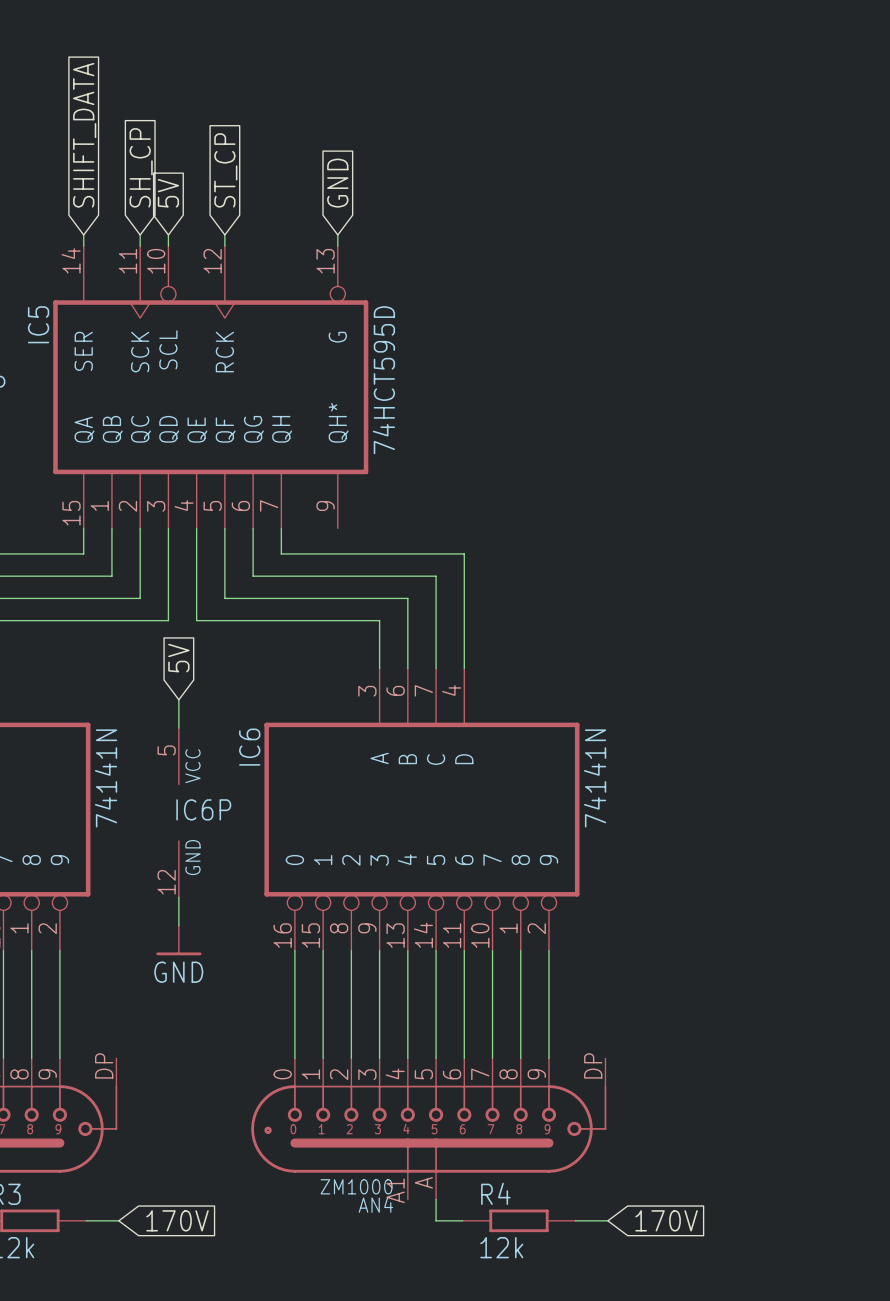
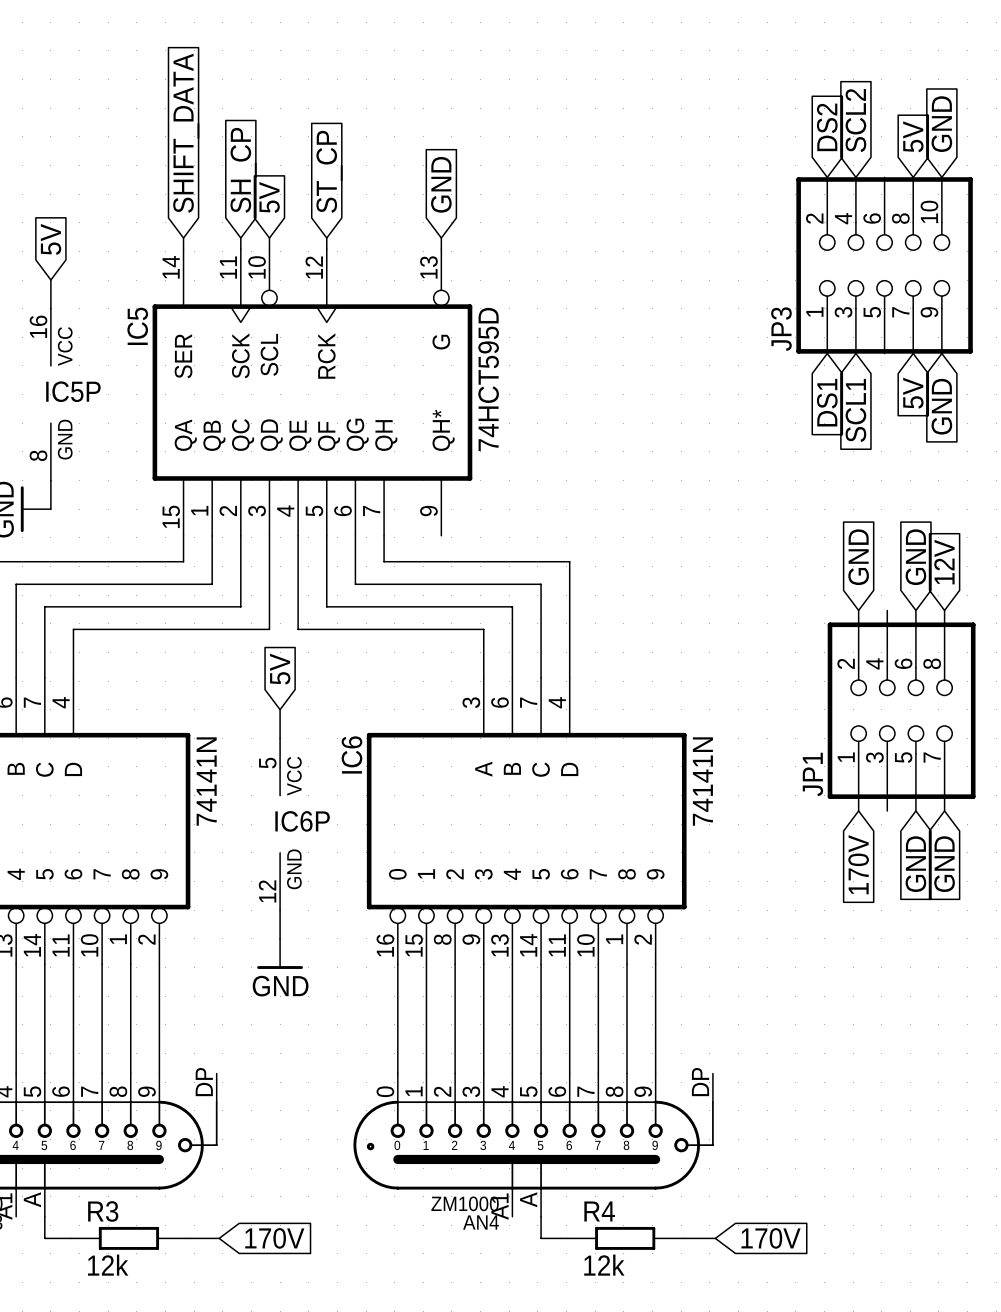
global label: none -> SCL2 (855, 120)
global label: none -> GND (941, 124)
global label: none -> DS2 (827, 127)
global label: none -> 5V (913, 136)
wire: none -> (827, 177) (827, 222)
wire: none -> (855, 177) (855, 222)
wire: none -> (884, 177) (884, 222)
wire: none -> (913, 177) (913, 222)
wire: none -> (941, 177) (941, 222)
JP3: none -> (884, 265)
wire: none -> (827, 308) (827, 353)
wire: none -> (855, 308) (855, 353)
wire: none -> (884, 308) (884, 353)
wire: none -> (913, 308) (913, 353)
wire: none -> (941, 308) (941, 353)
global label: none -> 5V (913, 393)
global label: none -> DS1 (827, 402)
global label: none -> GND (941, 406)
global label: none -> SCL1 (855, 410)
global label: none -> GND (858, 557)
global label: none -> GND (915, 557)
global label: none -> 12V (944, 562)
wire: none -> (858, 610) (858, 667)
wire: none -> (887, 610) (887, 667)
wire: none -> (915, 610) (915, 667)
wire: none -> (944, 610) (944, 667)
JP1: none -> (901, 710)
wire: none -> (858, 753) (858, 810)
wire: none -> (887, 753) (887, 810)
wire: none -> (915, 753) (915, 810)
wire: none -> (944, 753) (944, 810)
global label: none -> GND (915, 864)
global label: none -> GND (944, 864)
global label: none -> 170V (858, 864)

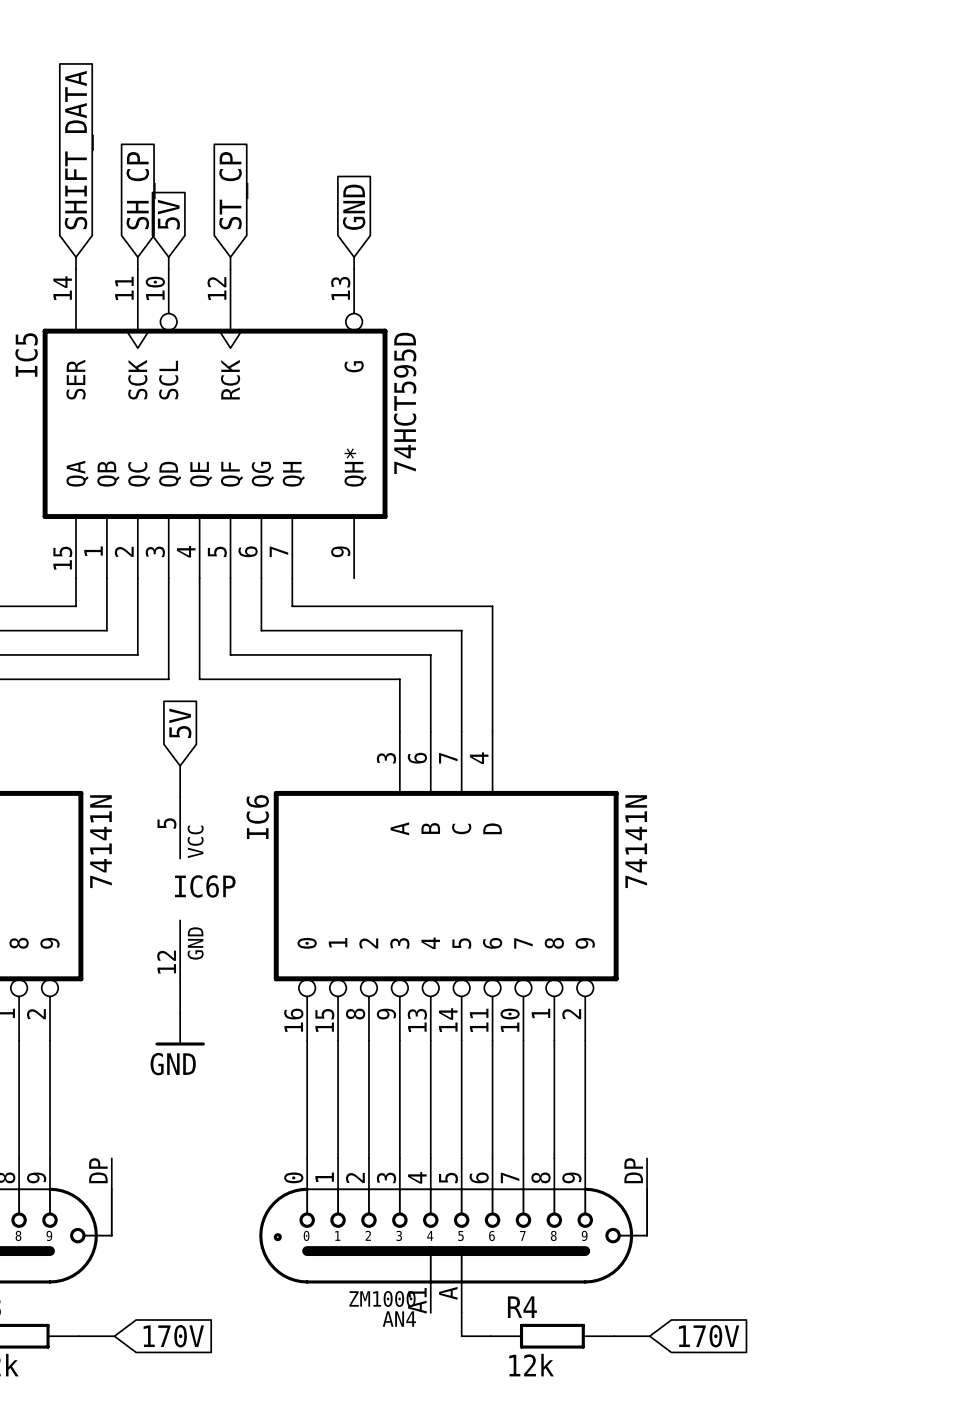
global label: SCL2 (855, 120) -> none
global label: GND (941, 124) -> none
global label: DS2 (827, 127) -> none
global label: 5V (913, 136) -> none
wire: (827, 177) (827, 222) -> none
wire: (855, 177) (855, 222) -> none
wire: (884, 177) (884, 222) -> none
wire: (913, 177) (913, 222) -> none
wire: (941, 177) (941, 222) -> none
JP3: (884, 265) -> none
wire: (827, 308) (827, 353) -> none
wire: (855, 308) (855, 353) -> none
wire: (884, 308) (884, 353) -> none
wire: (913, 308) (913, 353) -> none
wire: (941, 308) (941, 353) -> none
global label: 5V (913, 393) -> none
global label: DS1 (827, 402) -> none
global label: GND (941, 406) -> none
global label: SCL1 (855, 410) -> none
global label: GND (858, 557) -> none
global label: GND (915, 557) -> none
global label: 12V (944, 562) -> none
wire: (858, 610) (858, 667) -> none
wire: (887, 610) (887, 667) -> none
wire: (915, 610) (915, 667) -> none
wire: (944, 610) (944, 667) -> none
JP1: (901, 710) -> none
wire: (858, 753) (858, 810) -> none
wire: (887, 753) (887, 810) -> none
wire: (915, 753) (915, 810) -> none
wire: (944, 753) (944, 810) -> none
global label: 170V (858, 864) -> none
global label: GND (915, 864) -> none
global label: GND (944, 864) -> none

